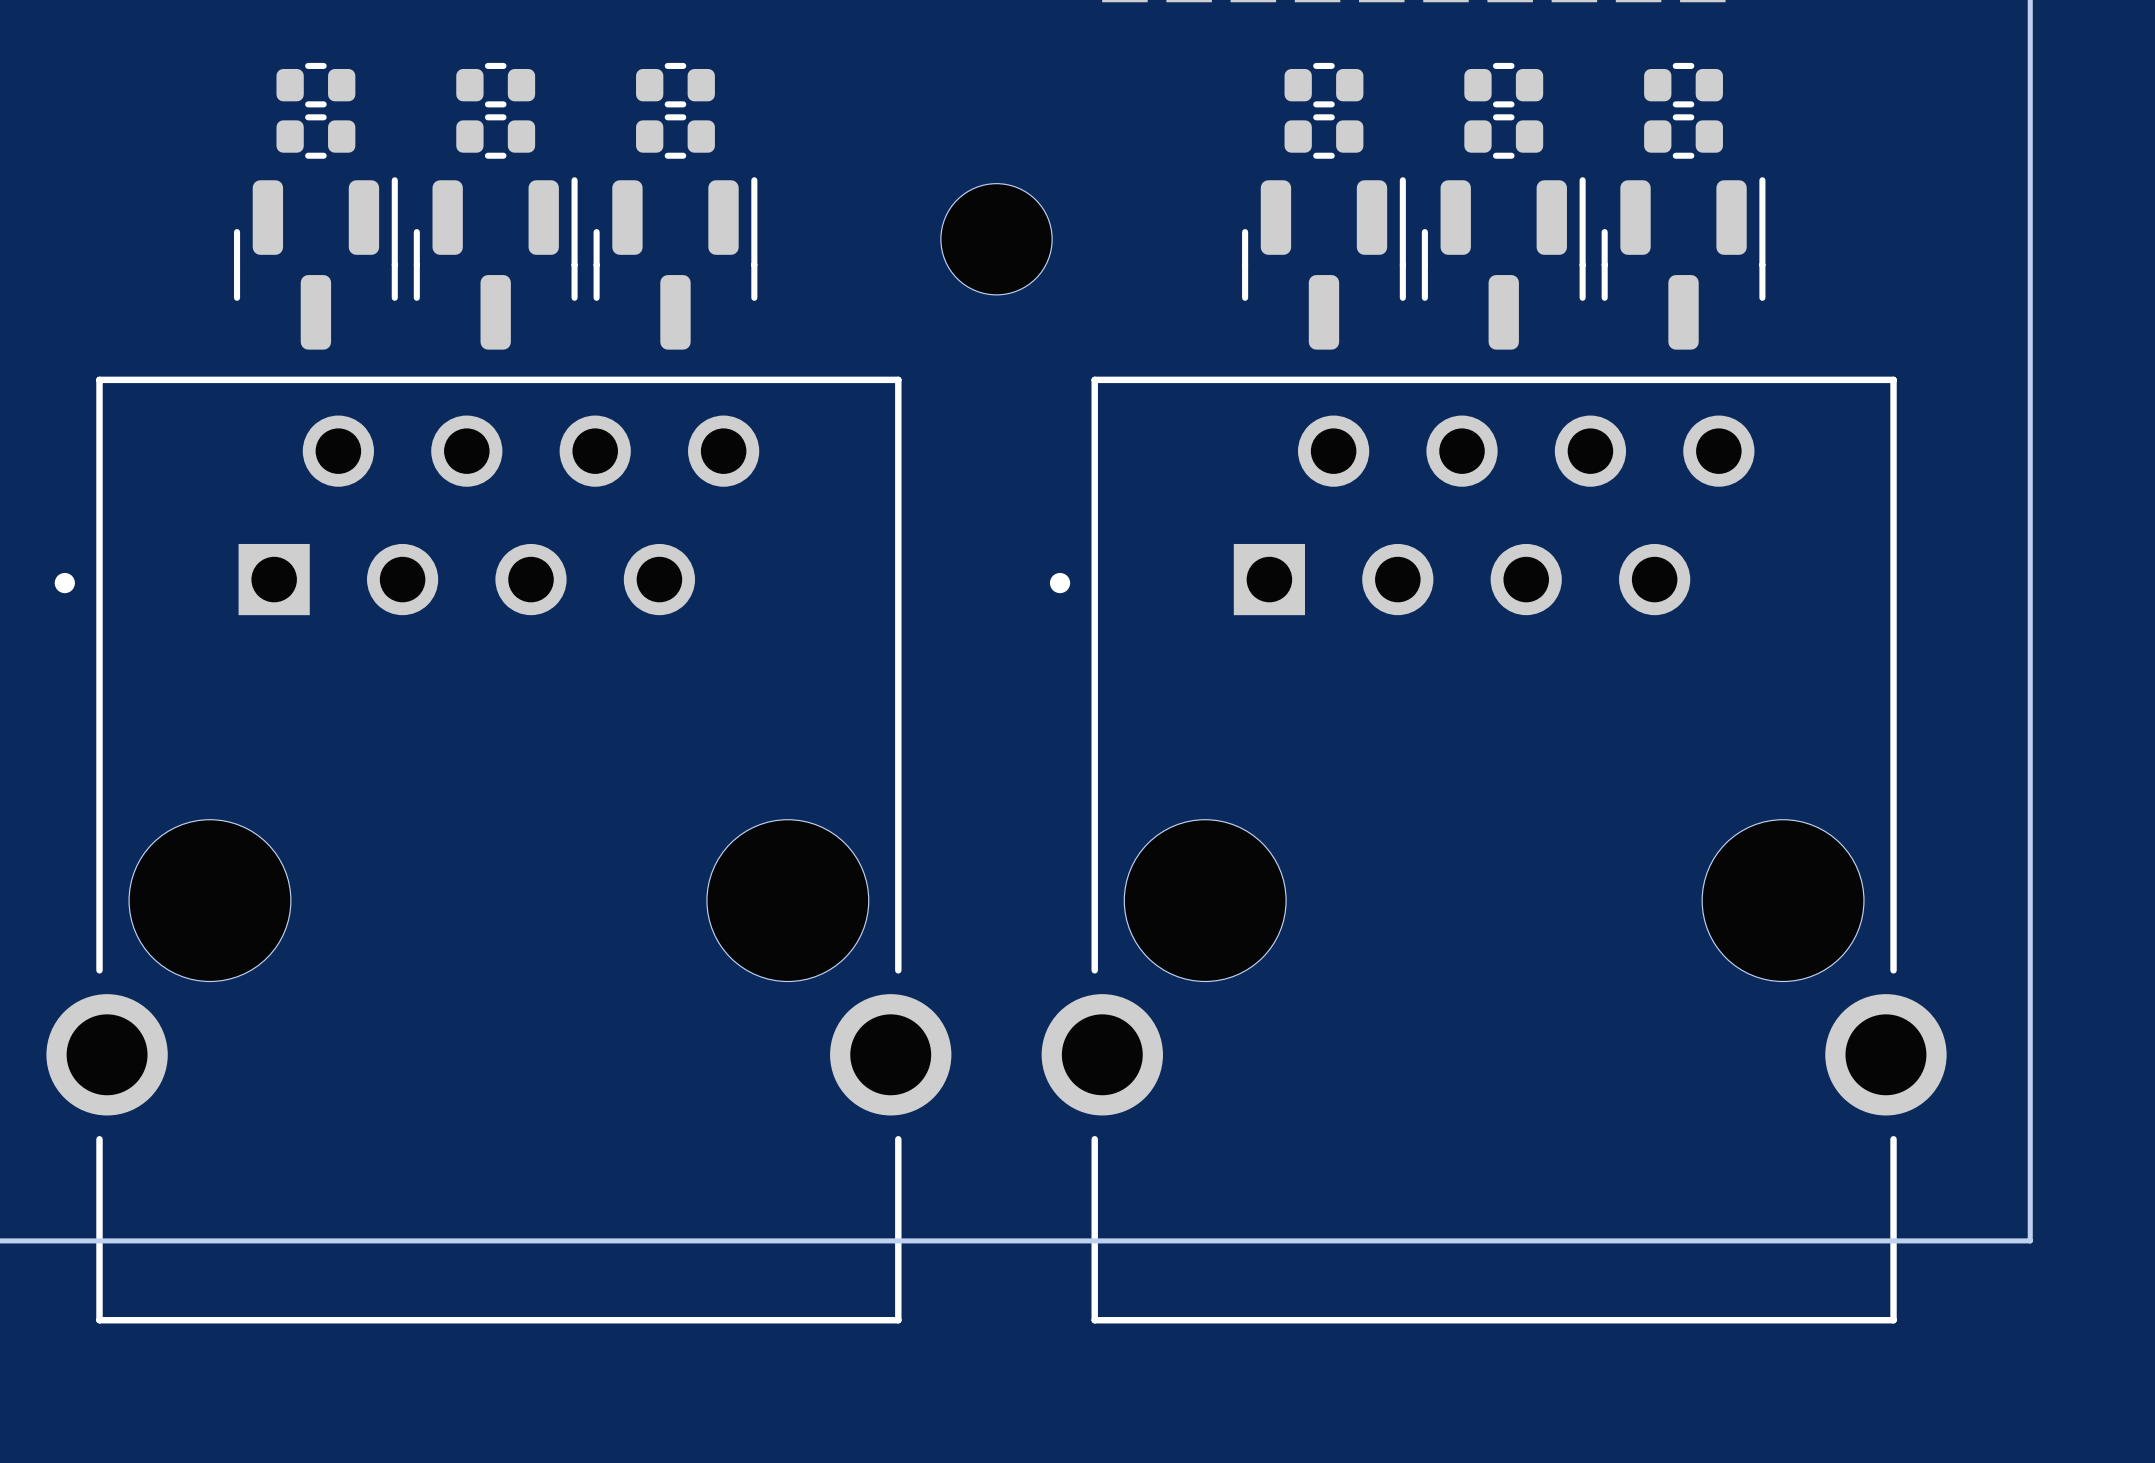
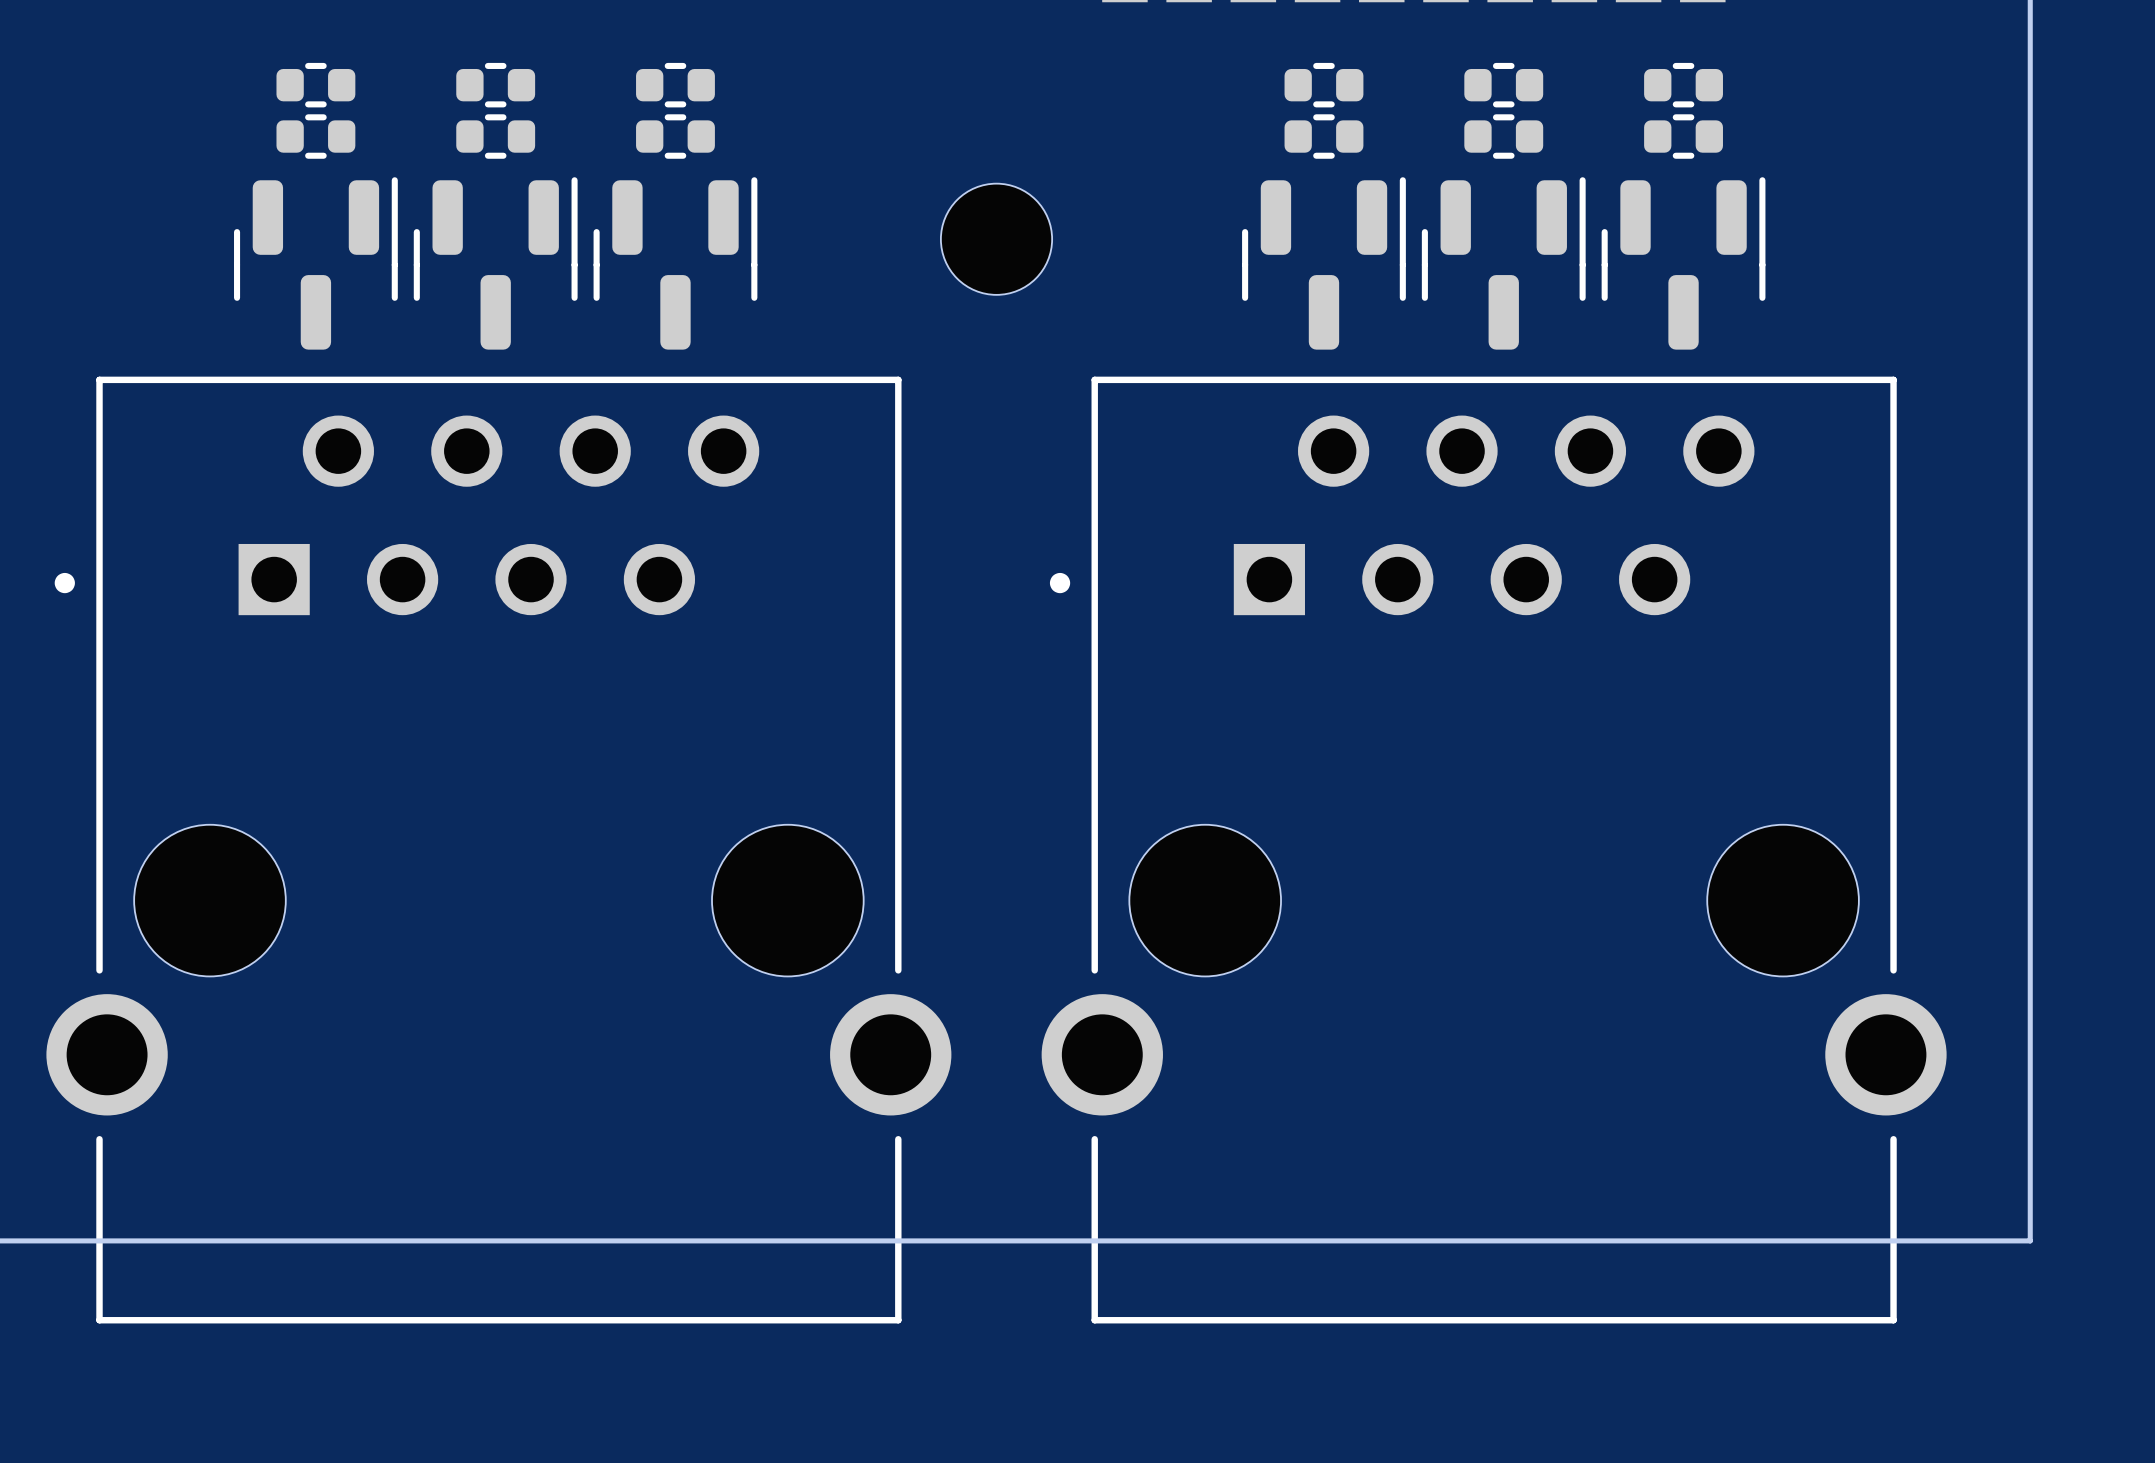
part footprint: [46, 376, 952, 1324] -> [46, 376, 952, 1324]
part footprint: [1041, 376, 1947, 1324] -> [1041, 376, 1947, 1324]

